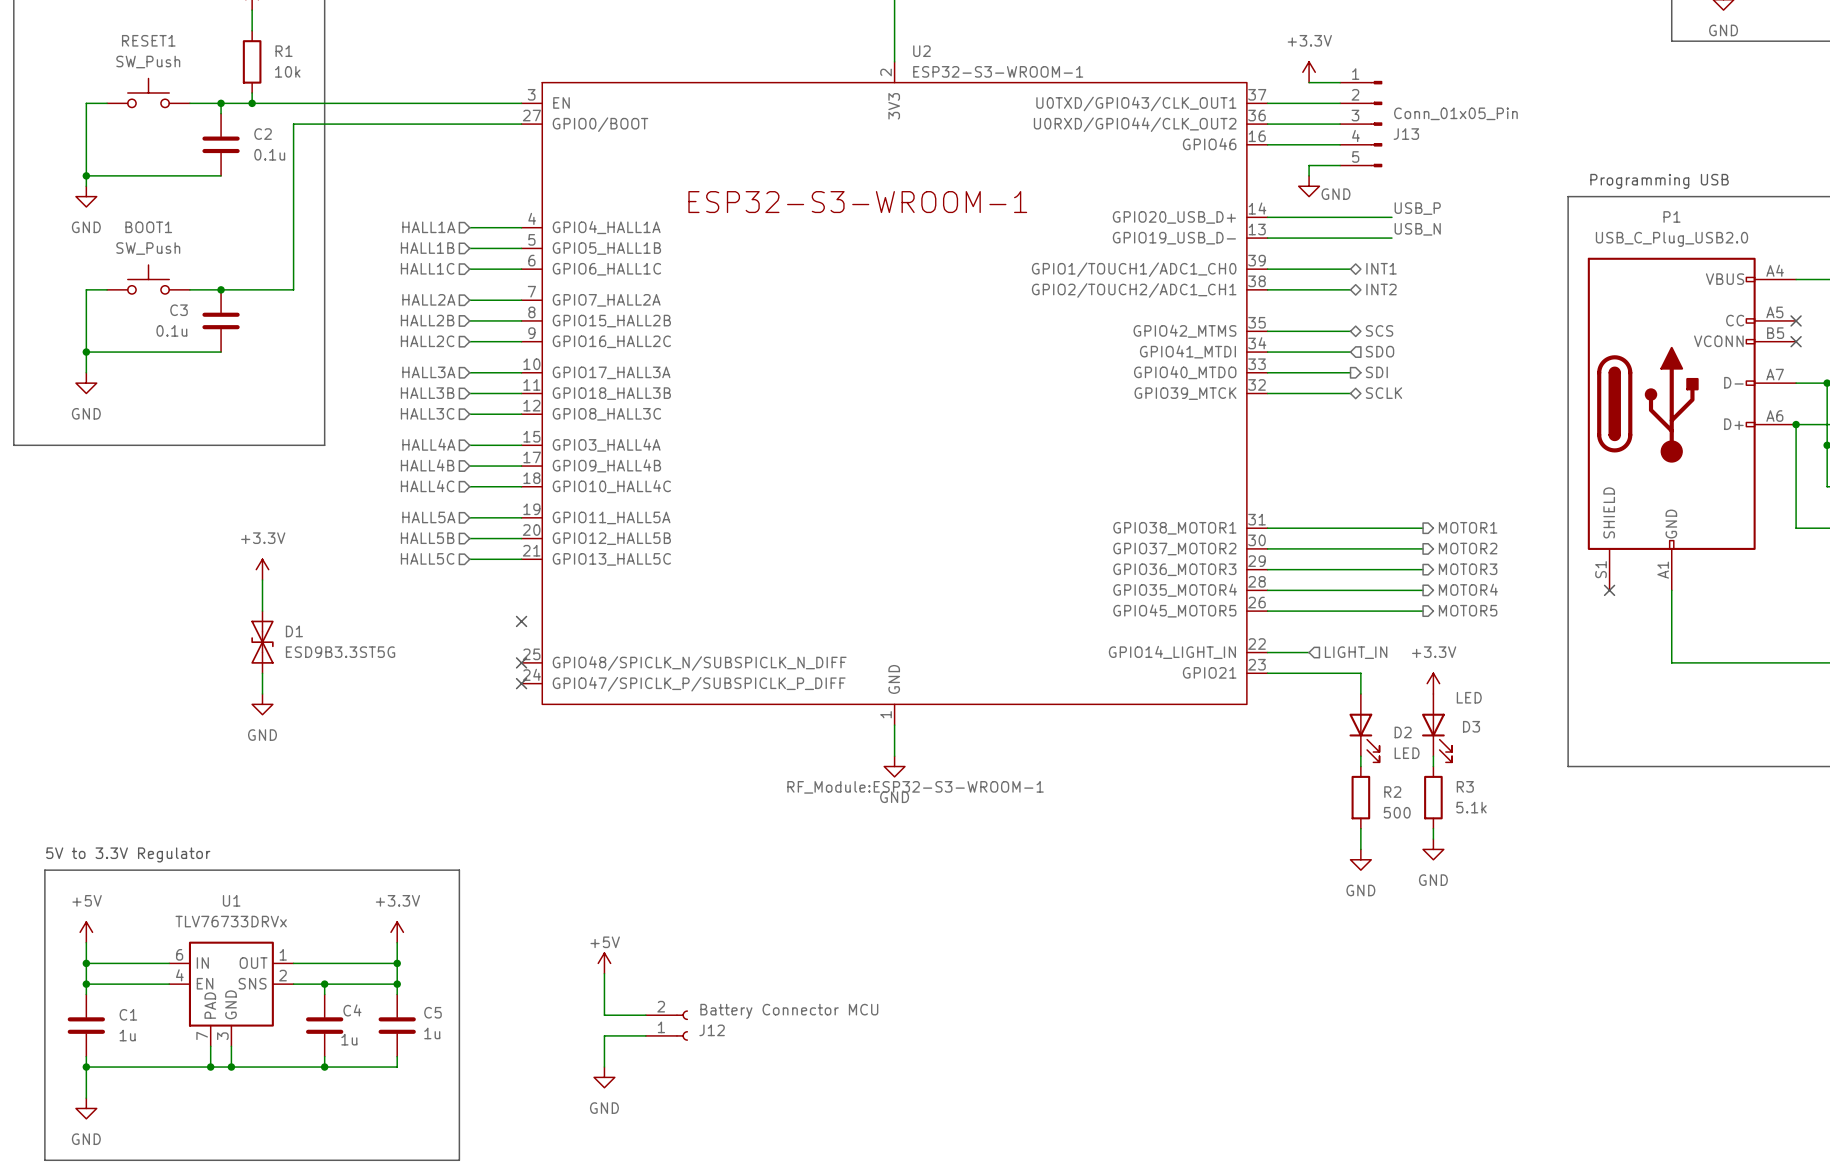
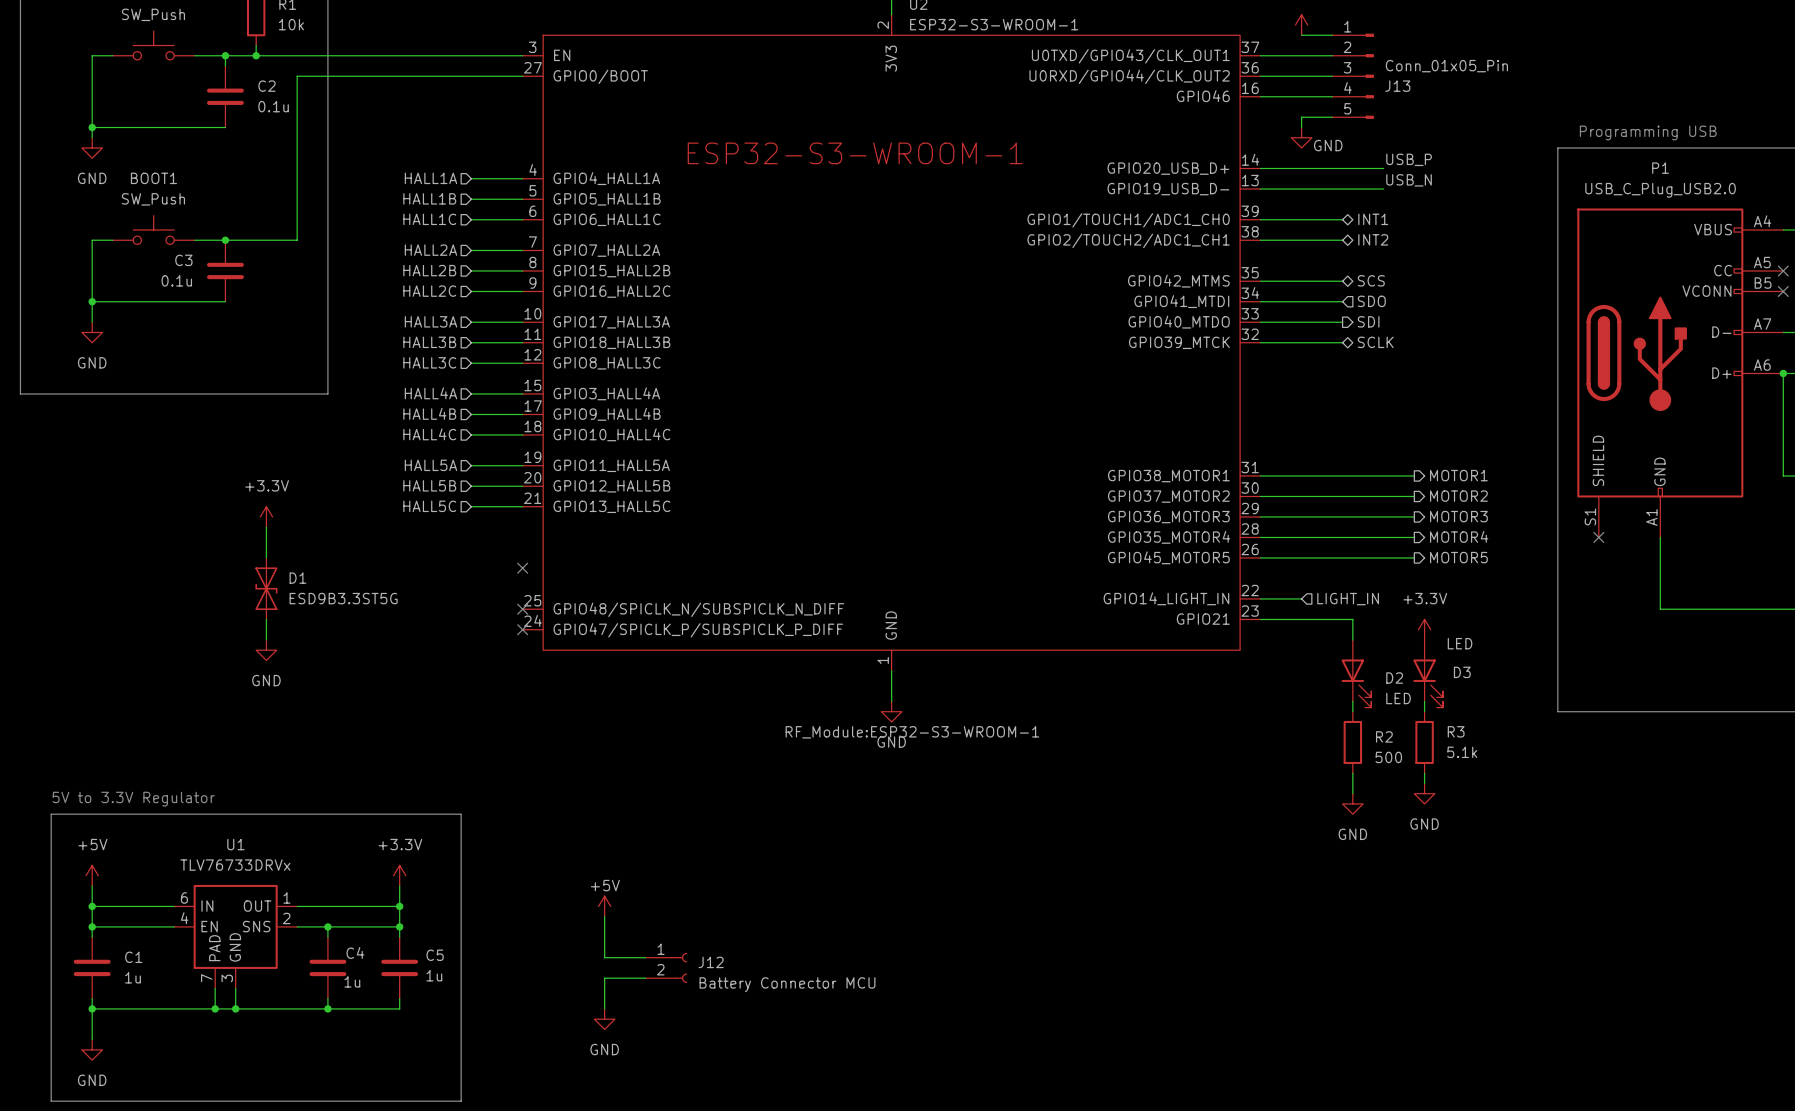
J12 flip: as is (682, 1025) -> up-down (681, 967)

